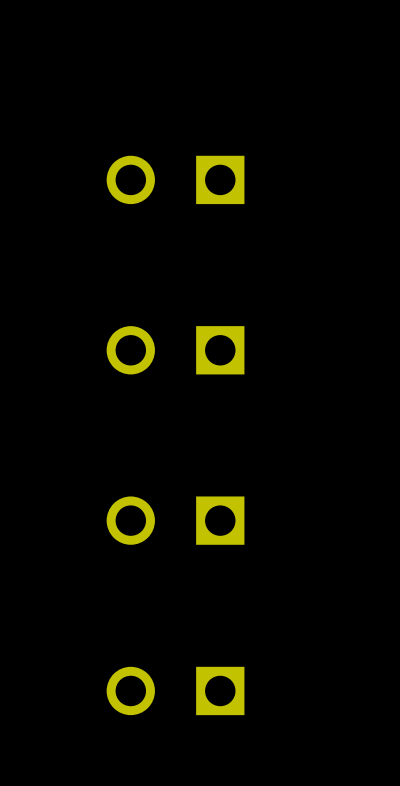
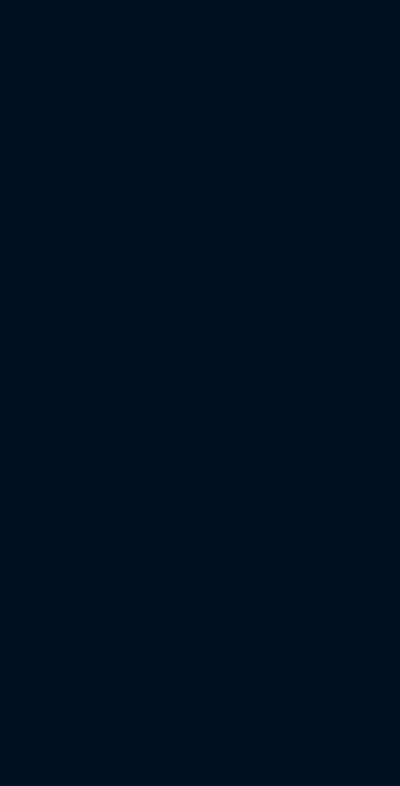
part: (175, 179) -> none
part: (175, 350) -> none
part: (175, 520) -> none
part: (175, 690) -> none

